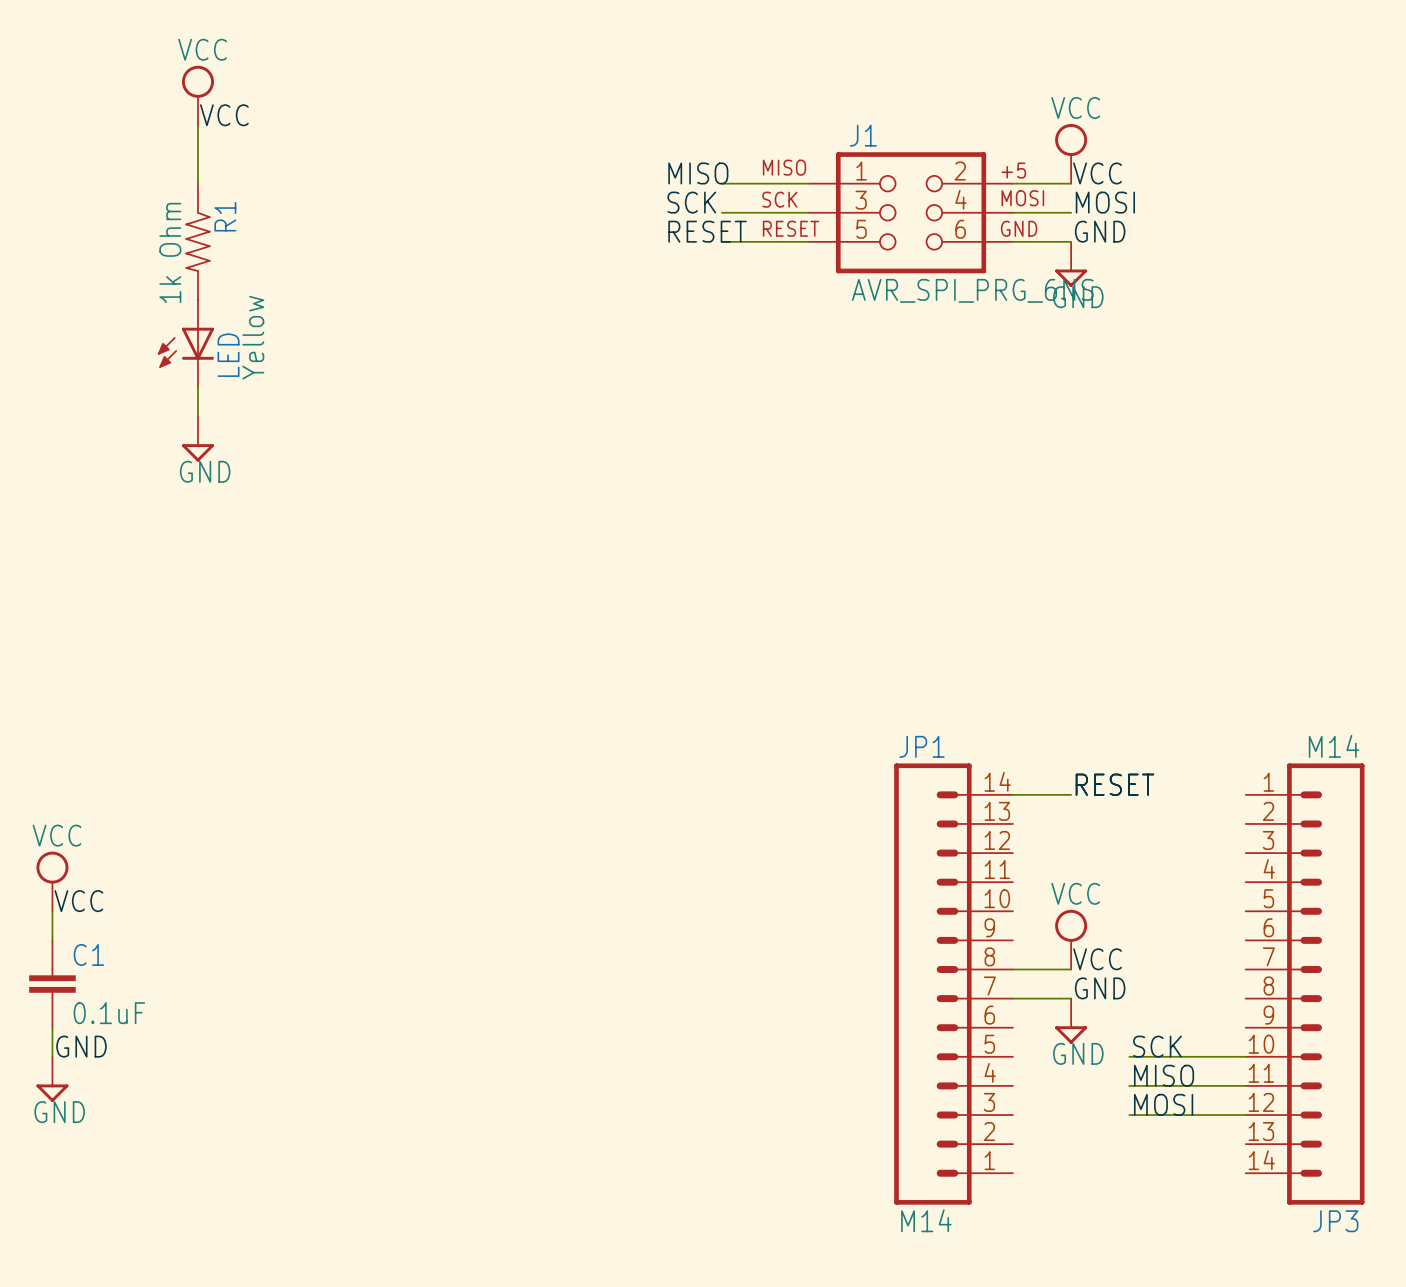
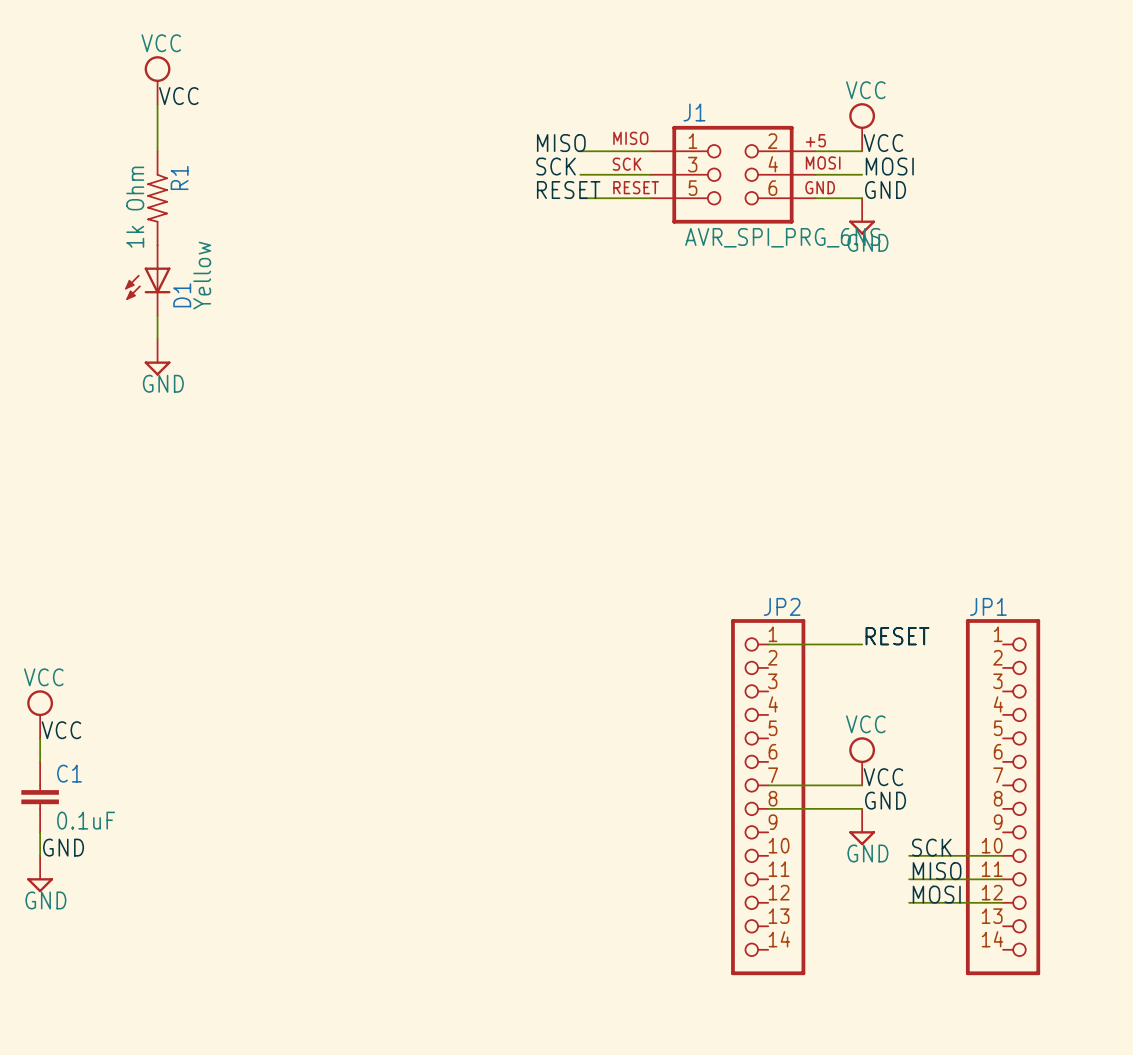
LED name: LED (228, 355) -> D1 (182, 295)
JP1 symbol: [894, 763, 1013, 1205] -> [965, 619, 1041, 976]
JP2: none -> (768, 797)
JP3: M14 (1305, 984) -> none
JP1 value: M14 (926, 1220) -> none

